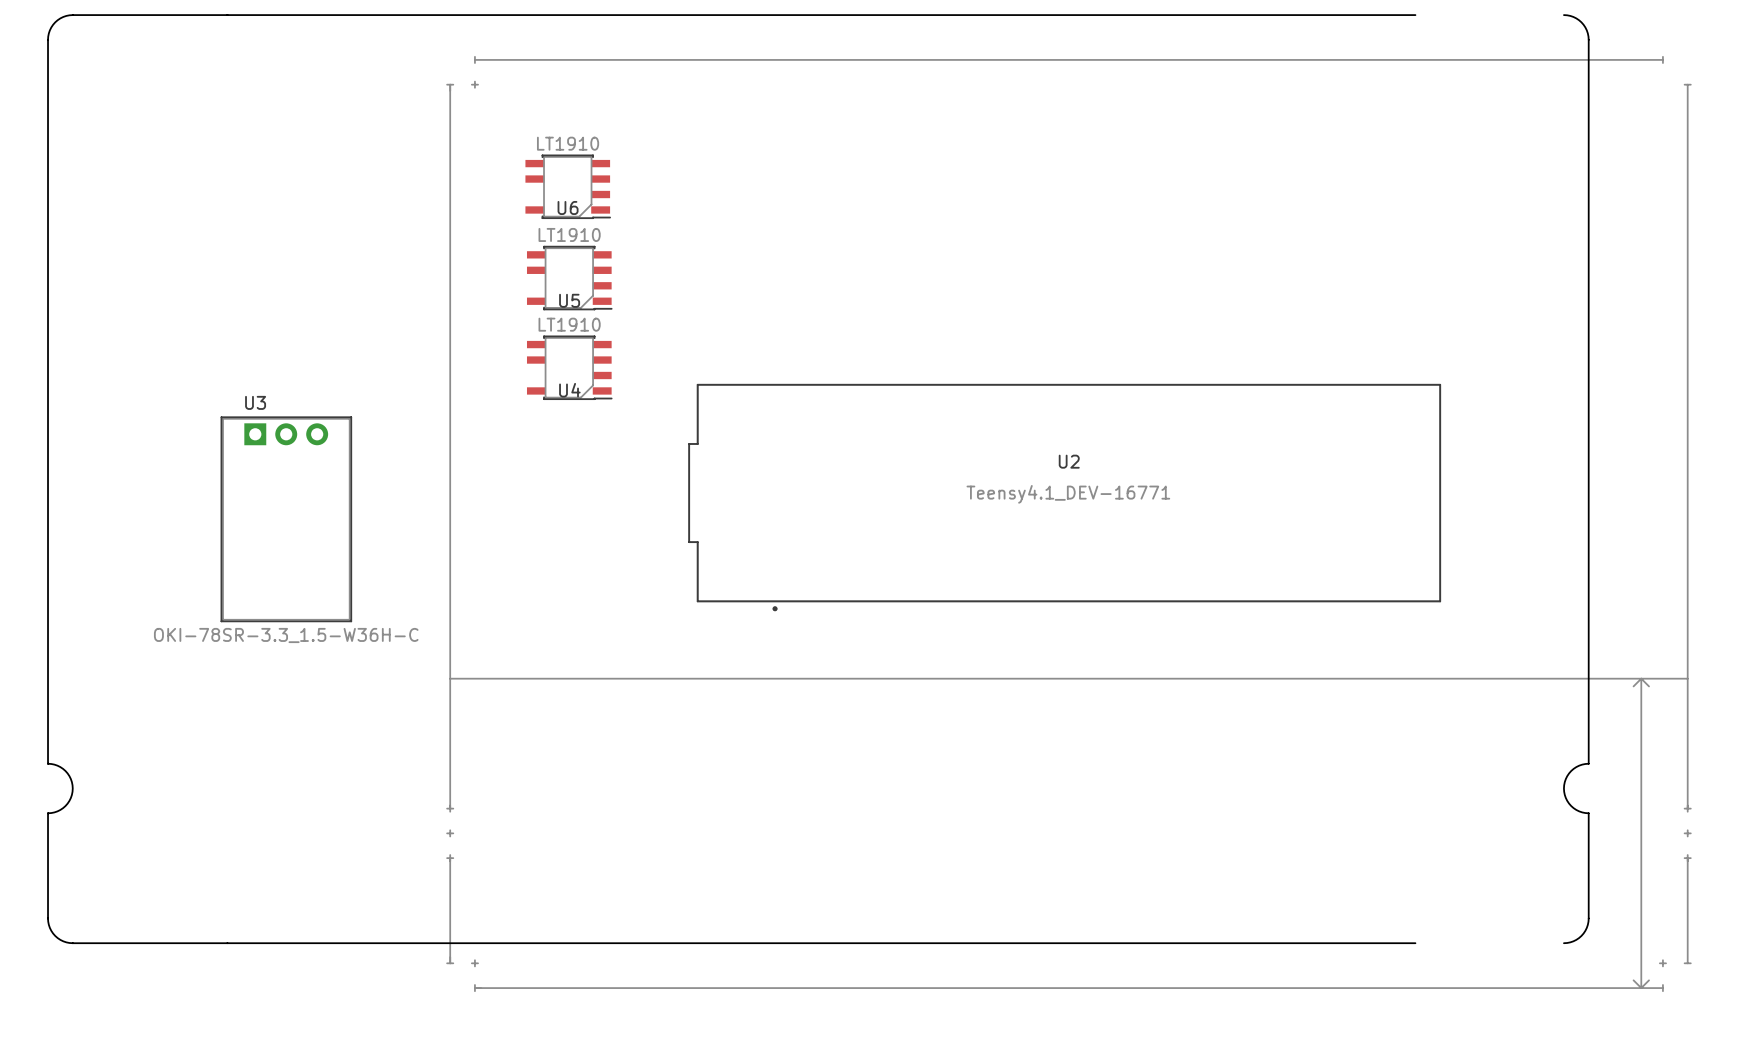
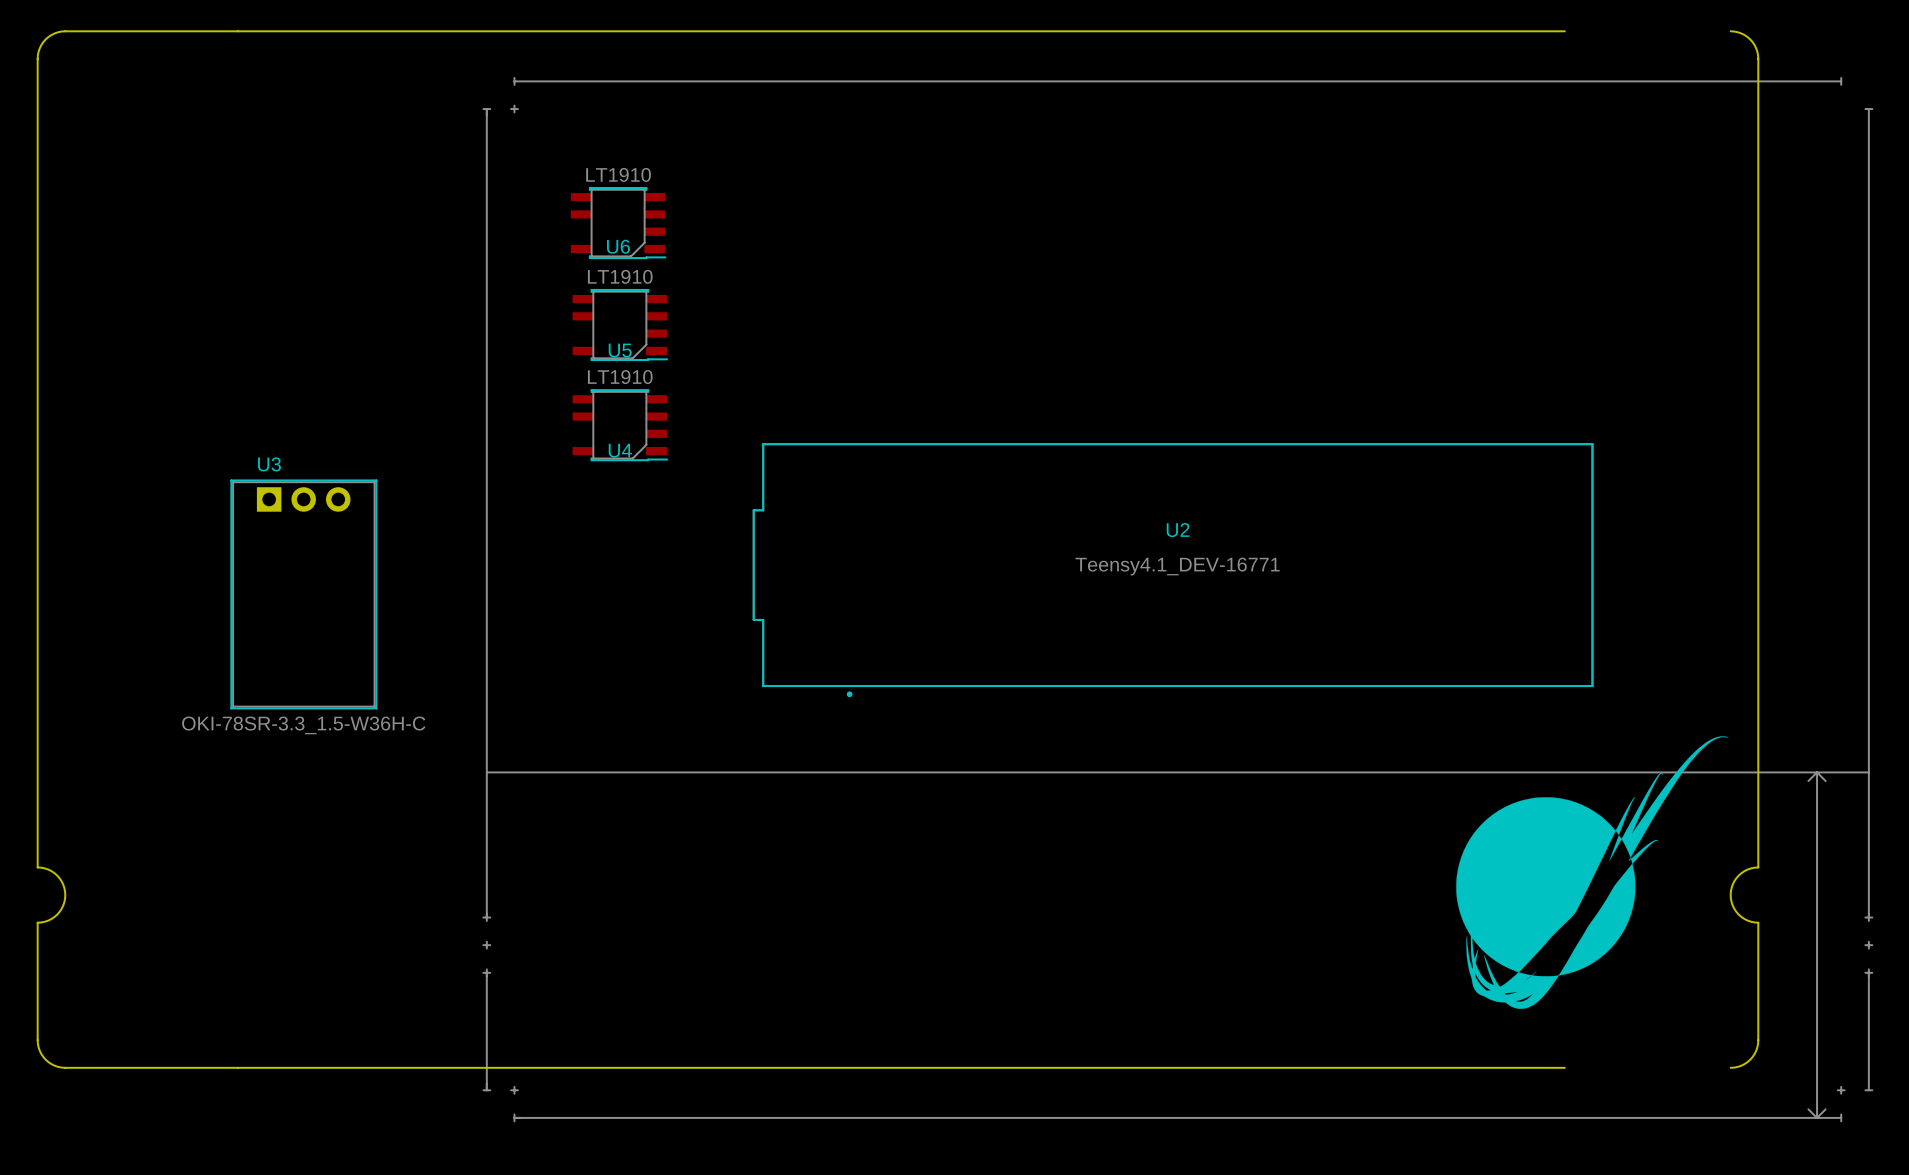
drawing: none -> [1456, 736, 1729, 1009]

